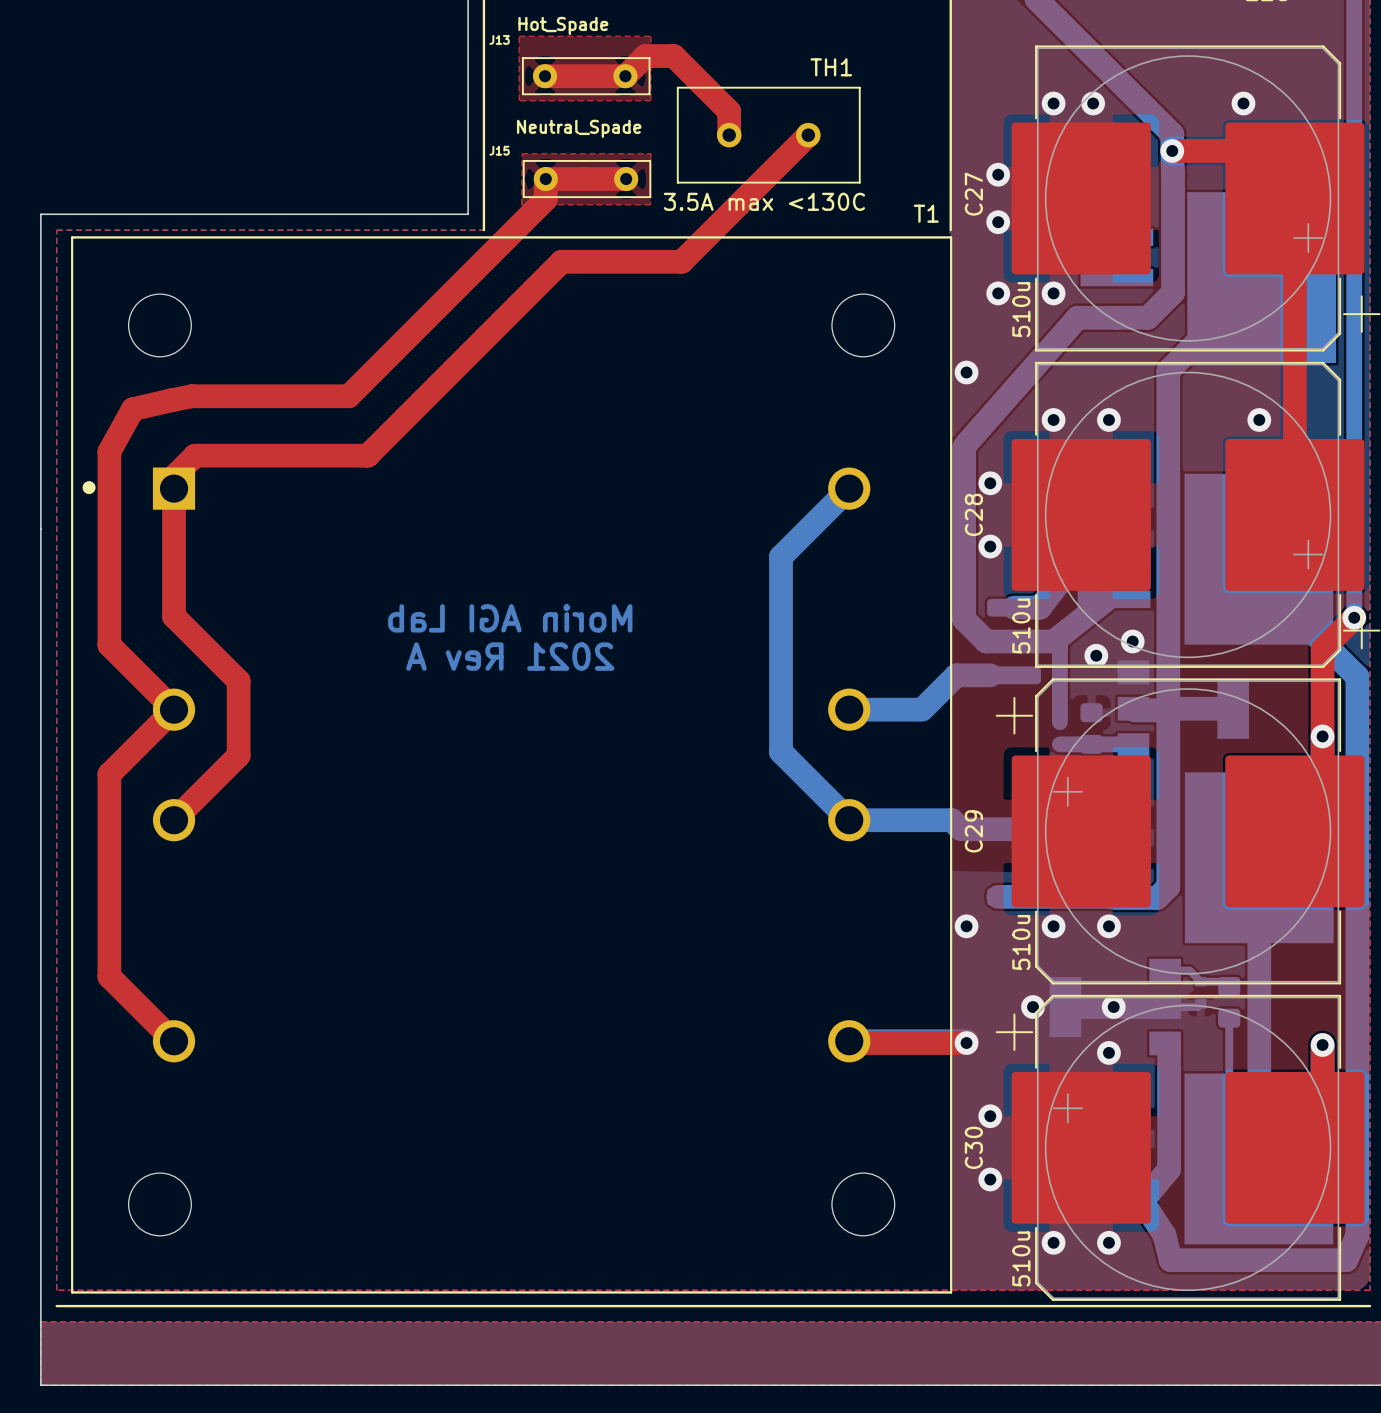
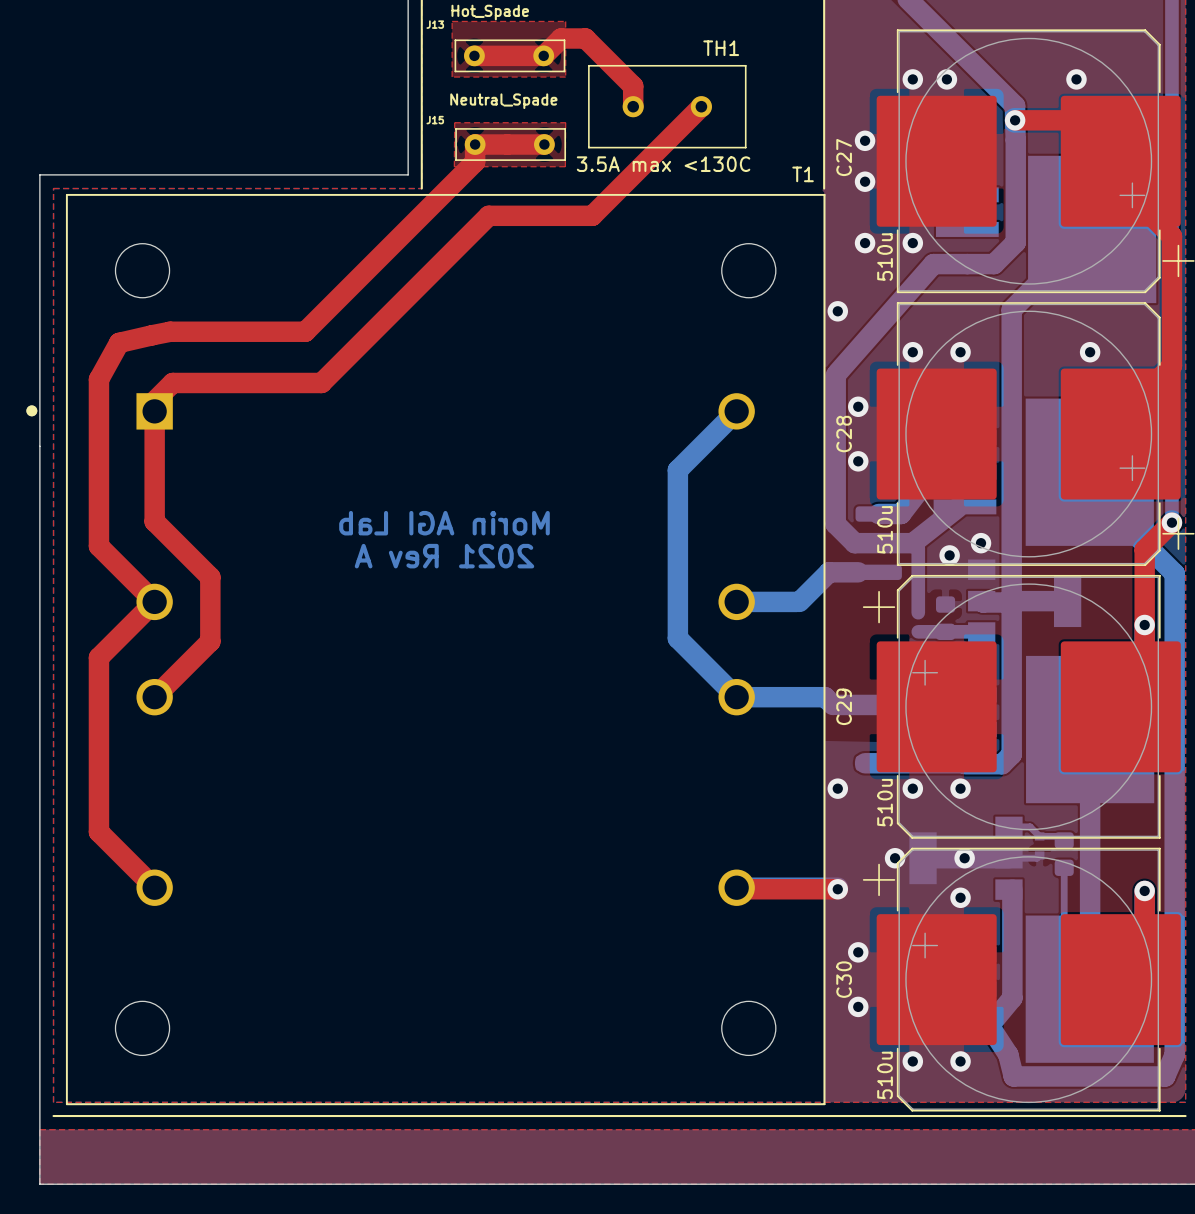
T1 footprint: [71, 236, 953, 1294] -> [26, 193, 826, 1106]
top track: (1294, 241) (1294, 495) -> (1120, 185) (1171, 236) (1171, 365) (1120, 416)

